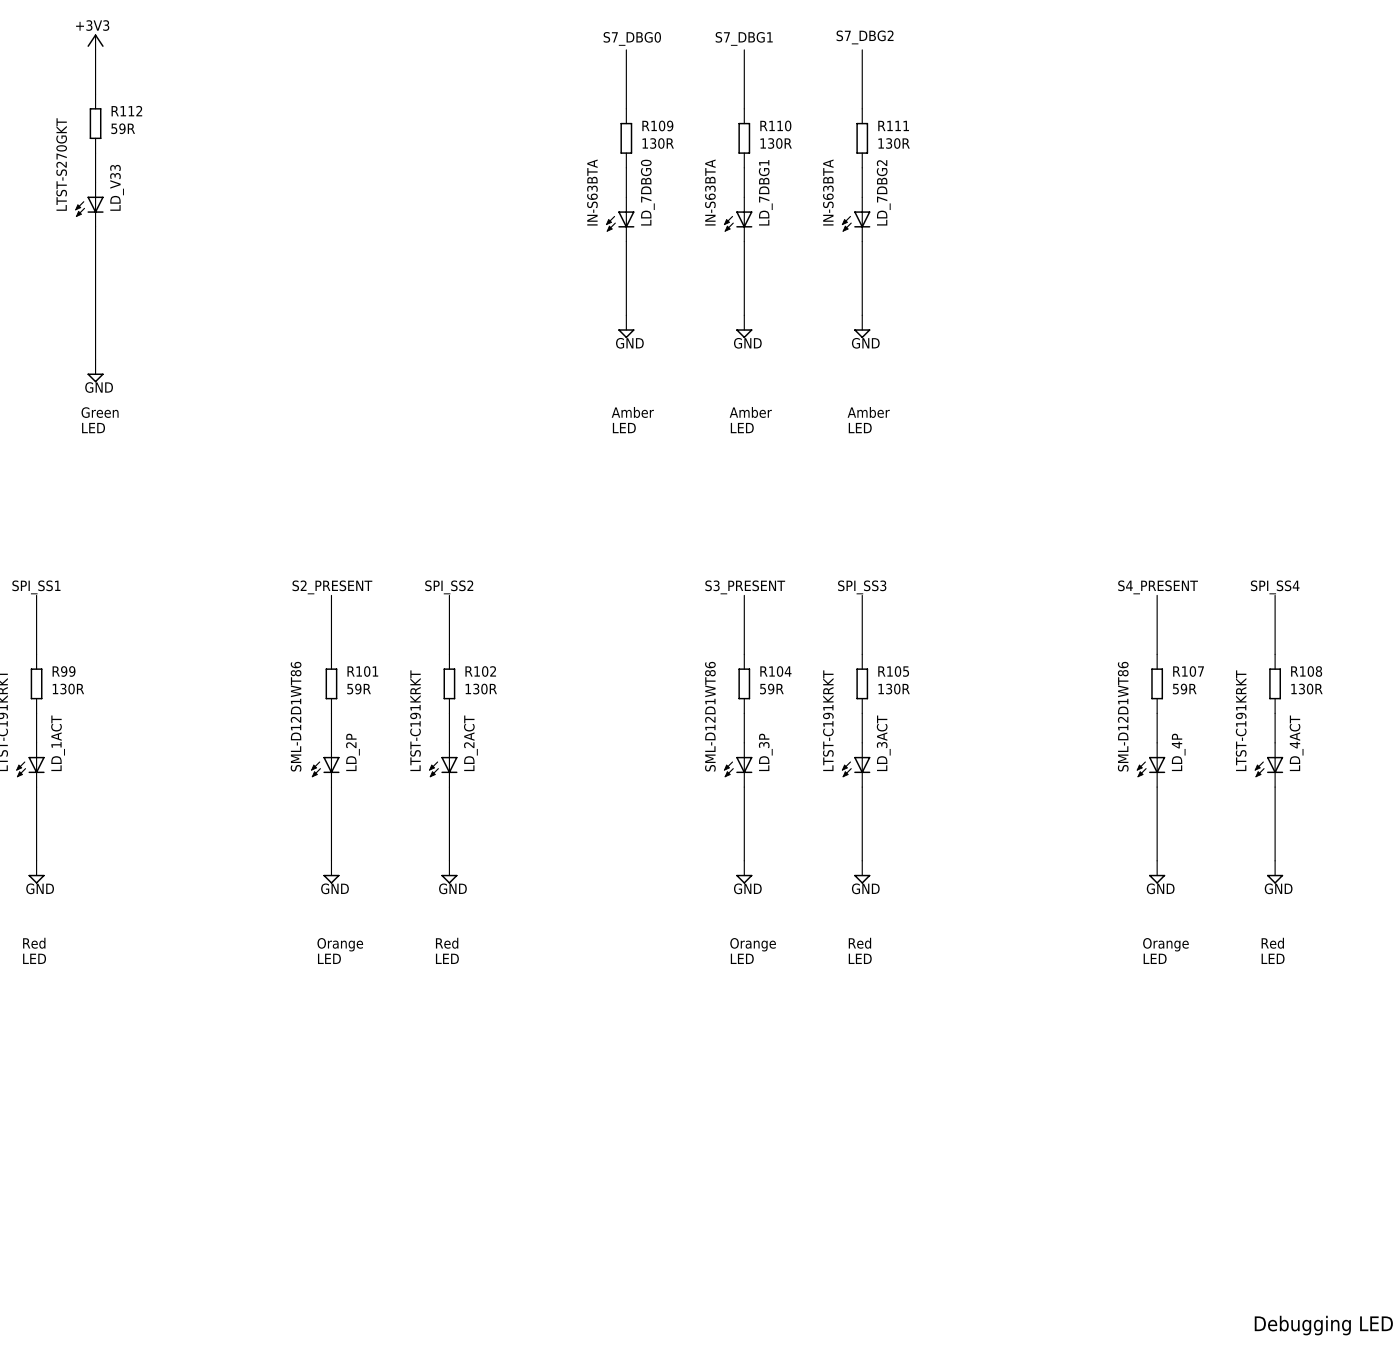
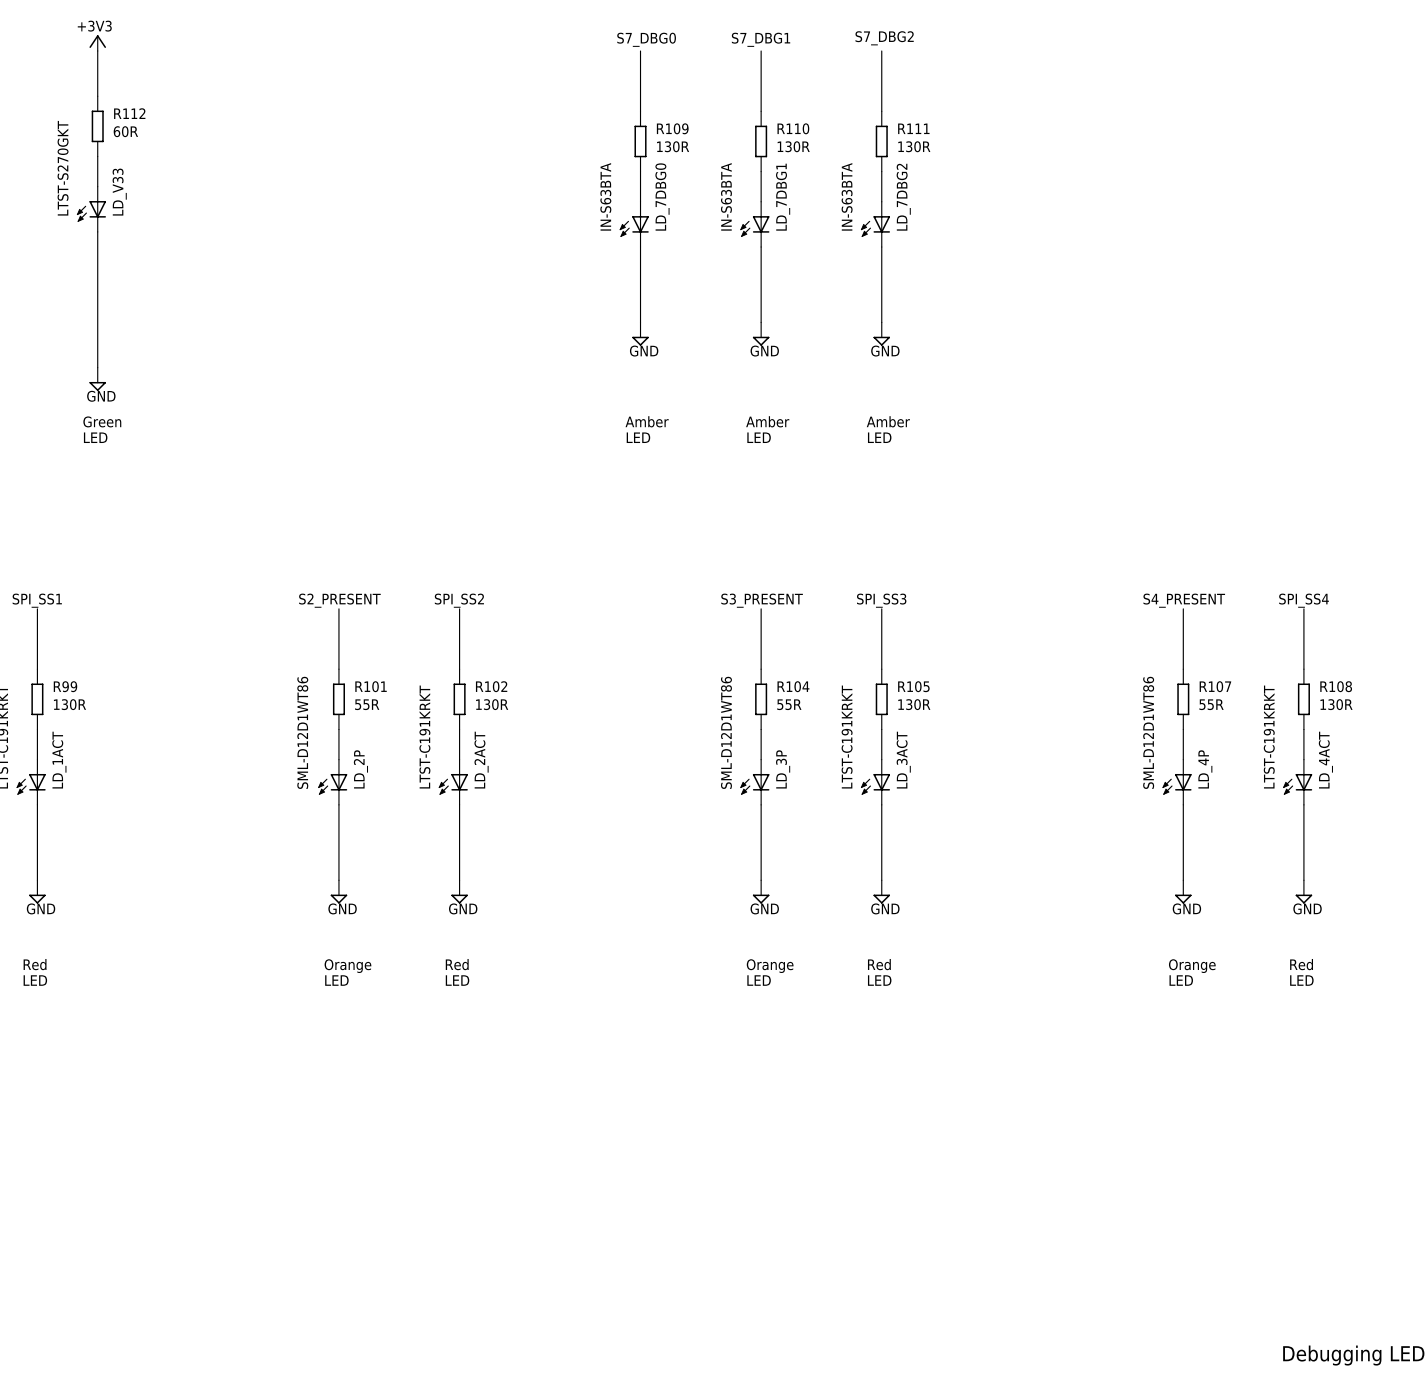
R112 value: 59R (123, 128) -> 60R (125, 131)
R101 value: 59R (359, 689) -> 55R (367, 704)
R104 value: 59R (771, 689) -> 55R (789, 704)
R107 value: 59R (1184, 689) -> 55R (1211, 704)

